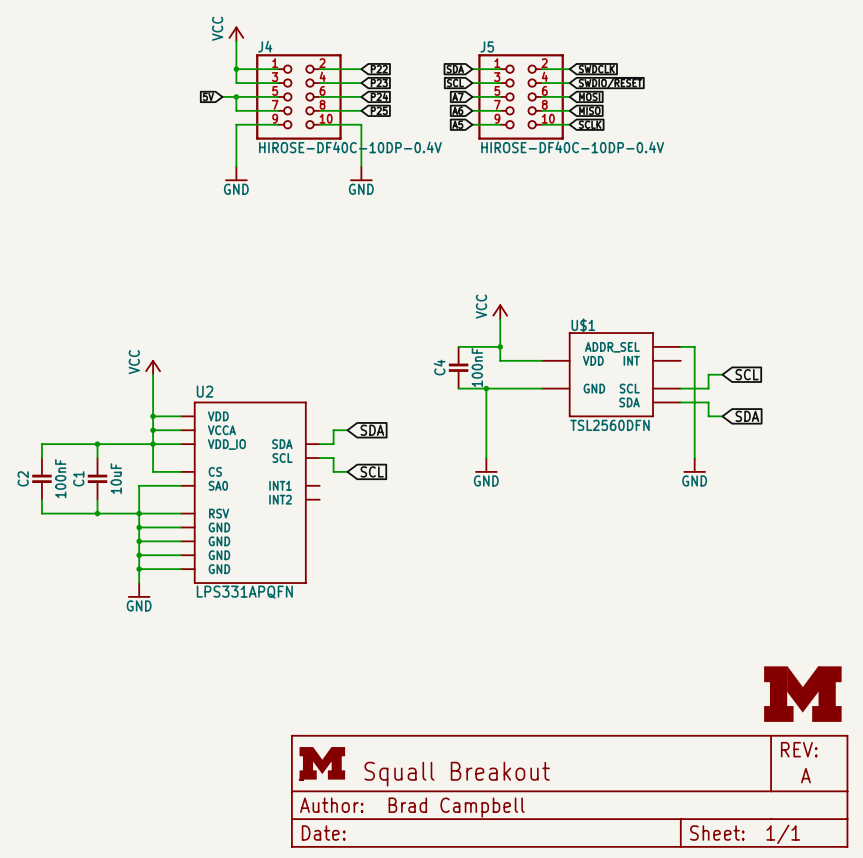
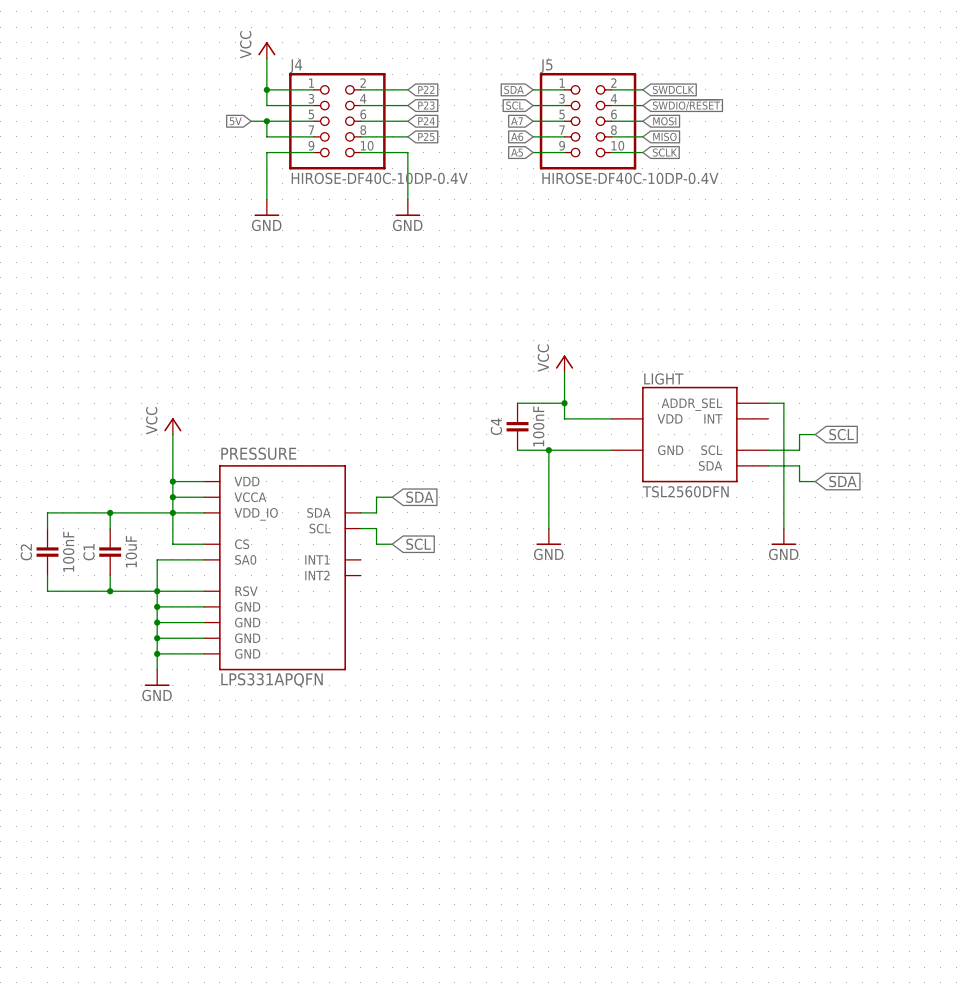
U$1 name: U$1 (583, 325) -> LIGHT (663, 378)
U2 name: U2 (205, 391) -> PRESSURE (258, 453)
part: (802, 694) -> none
part: (569, 791) -> none

